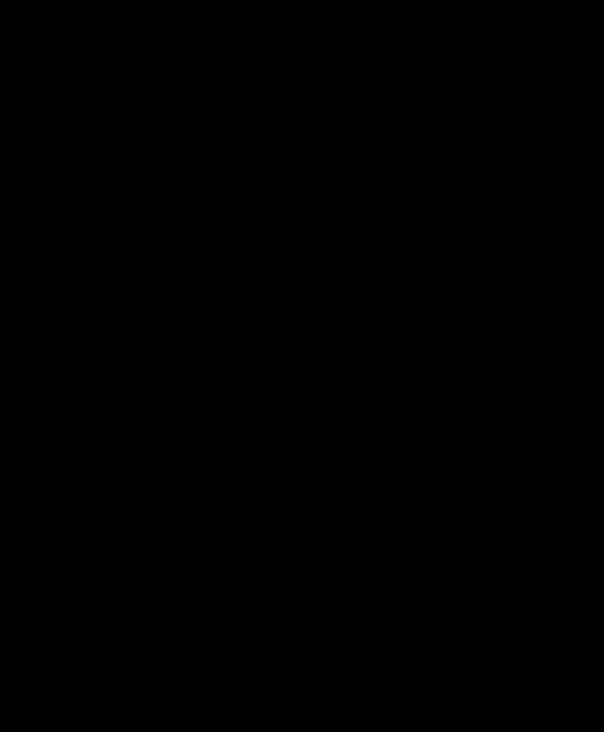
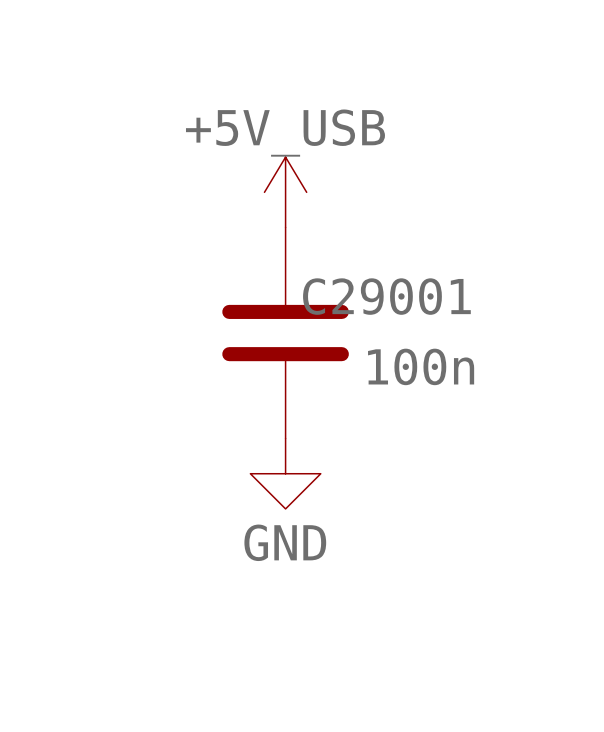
power symbol: none -> +5V_USB (285, 192)
C29001: none -> 100n (285, 333)
power symbol: none -> GND (285, 473)

